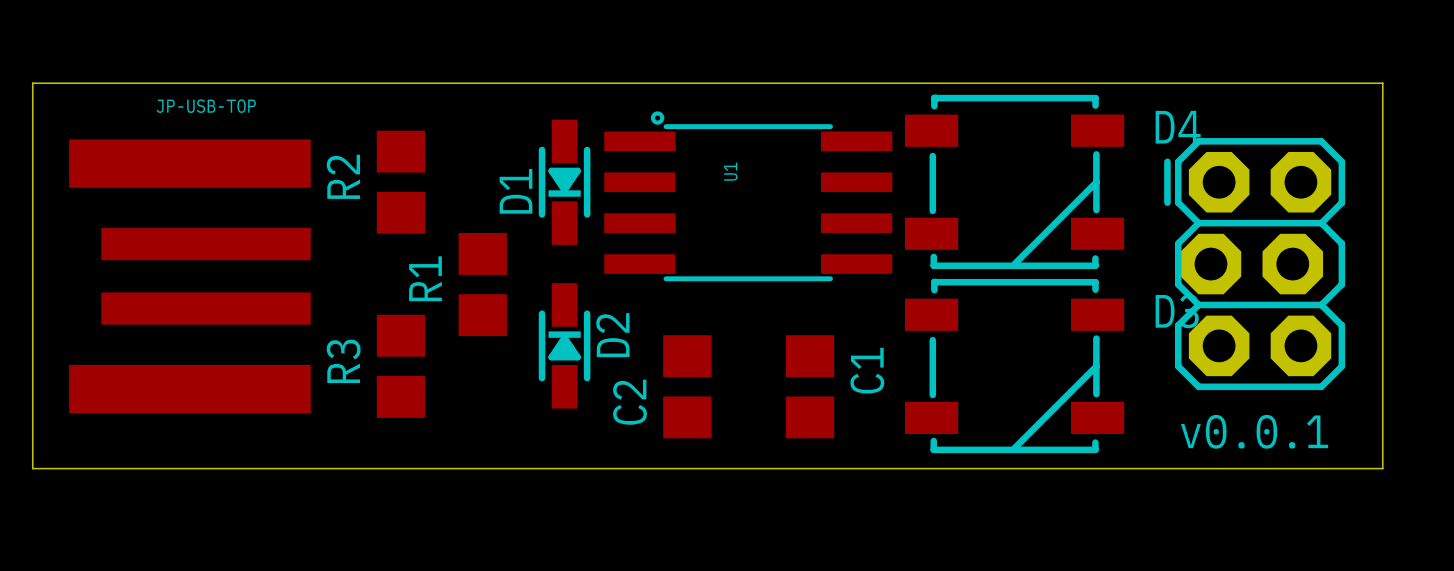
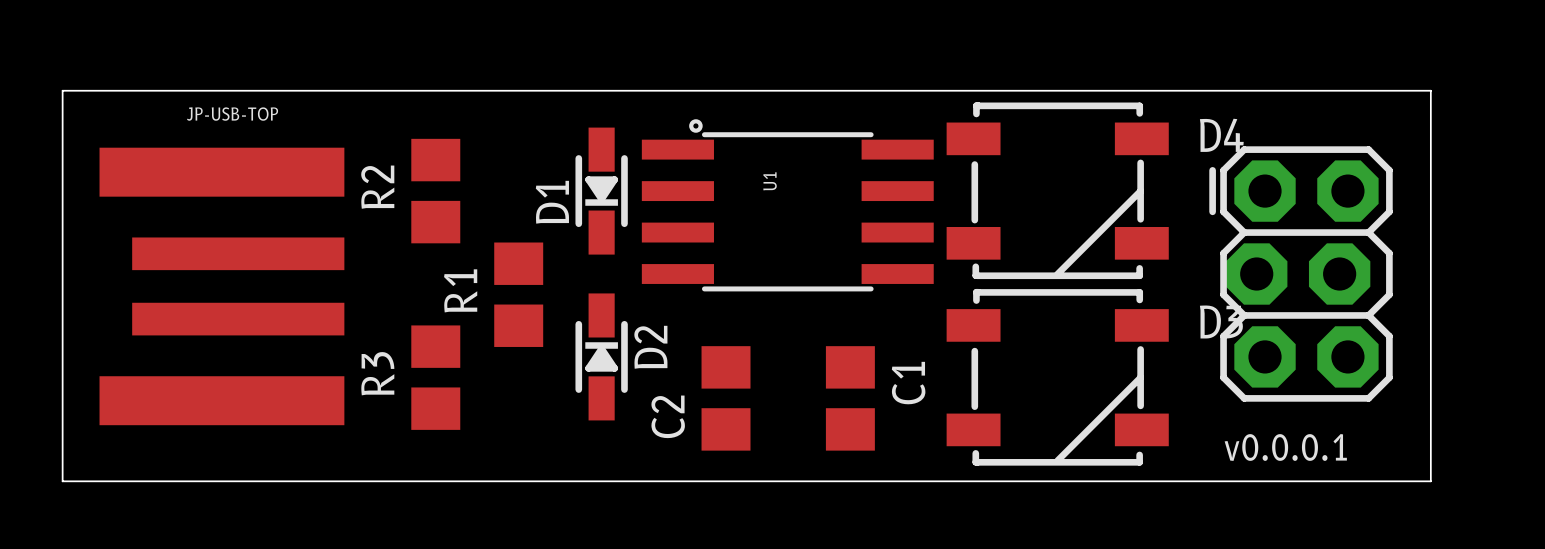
text: v0.0.1 (1254, 431) -> v0.0.0.1 (1285, 447)

